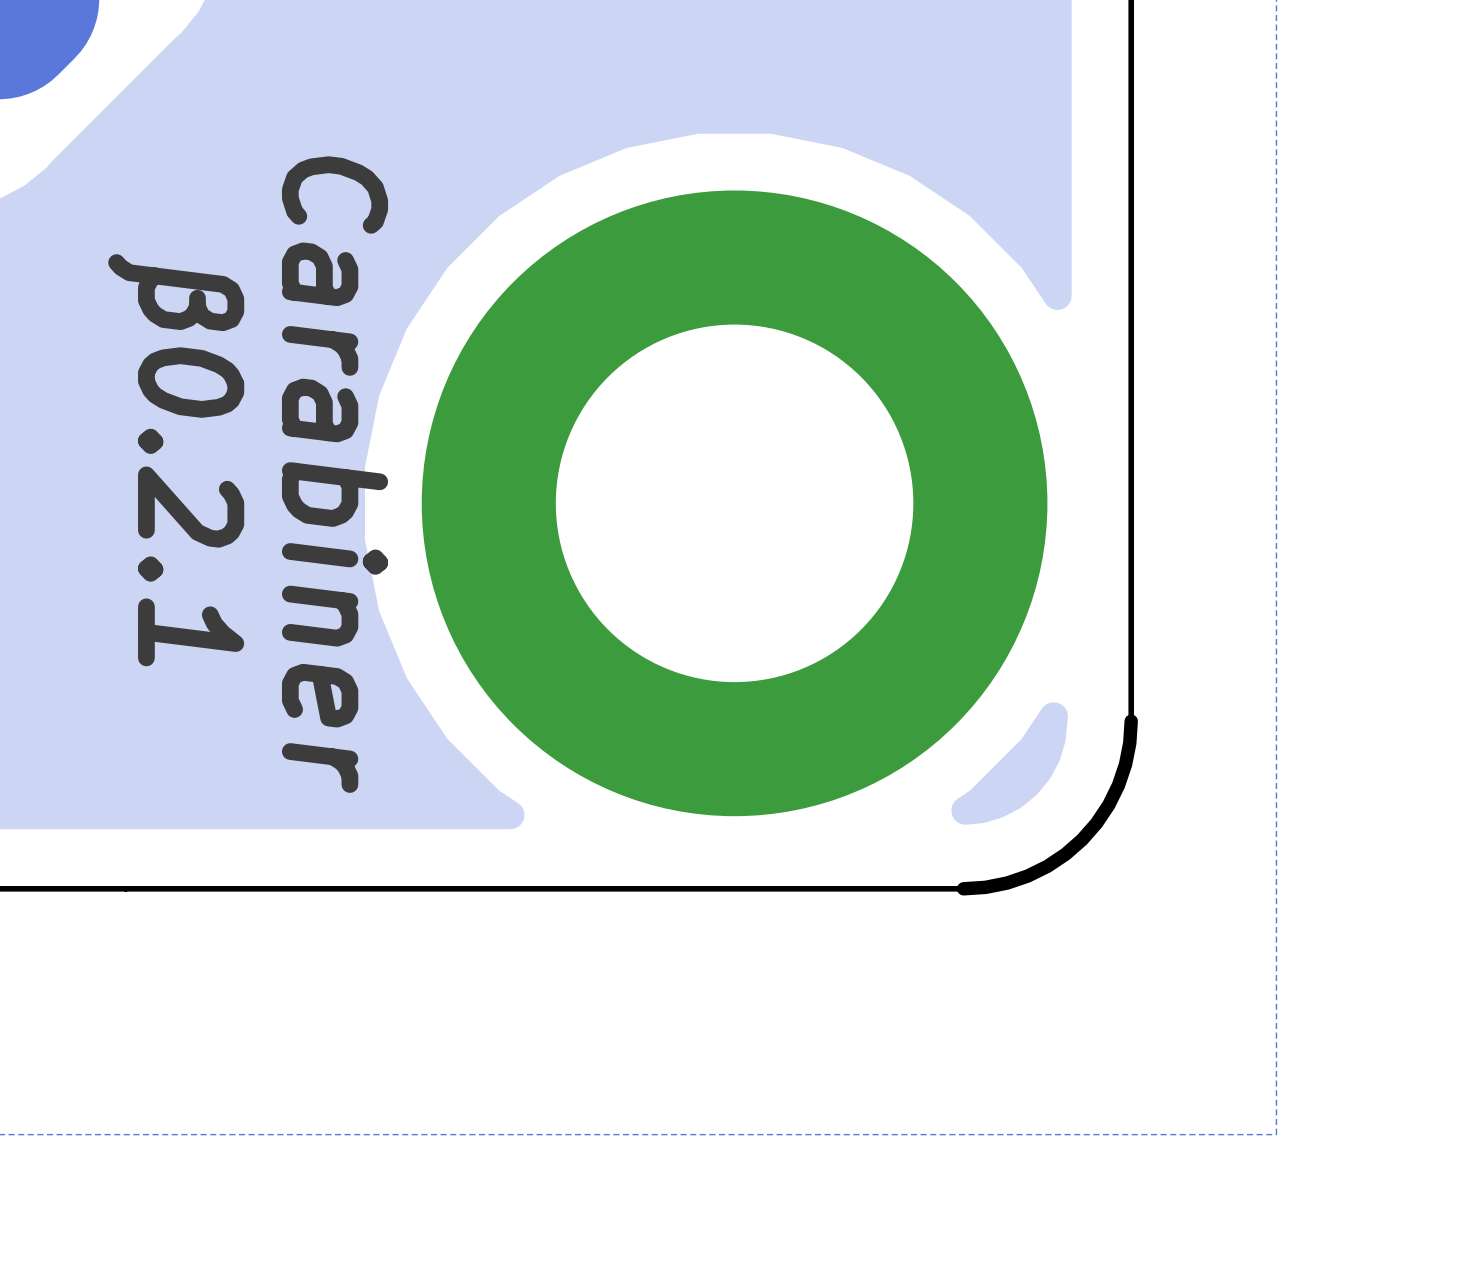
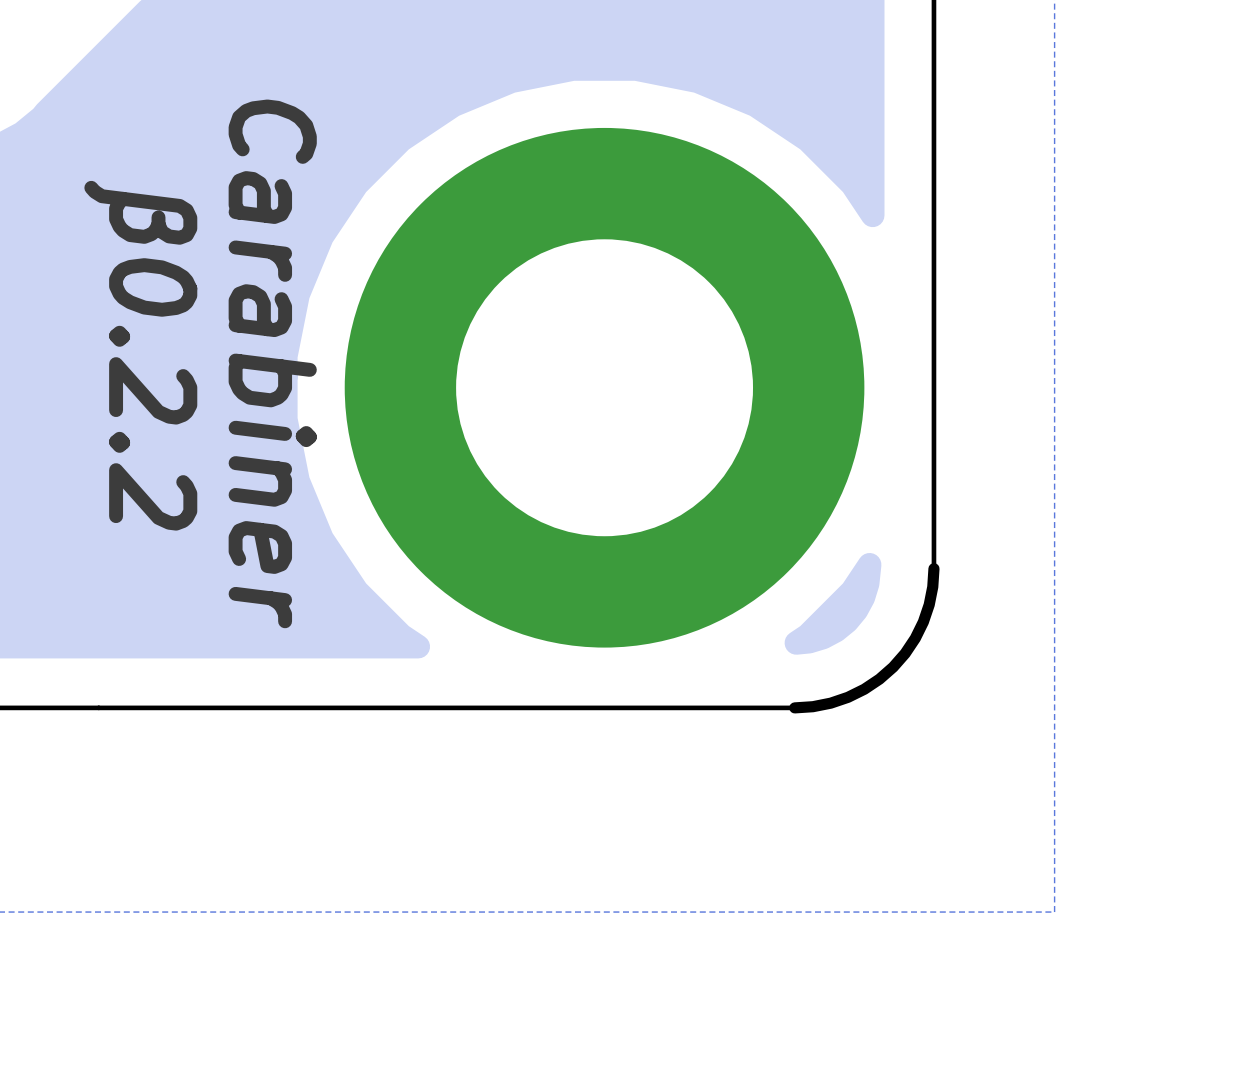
text: β0.2.1 (176, 460) -> β0.2.2 (140, 355)

